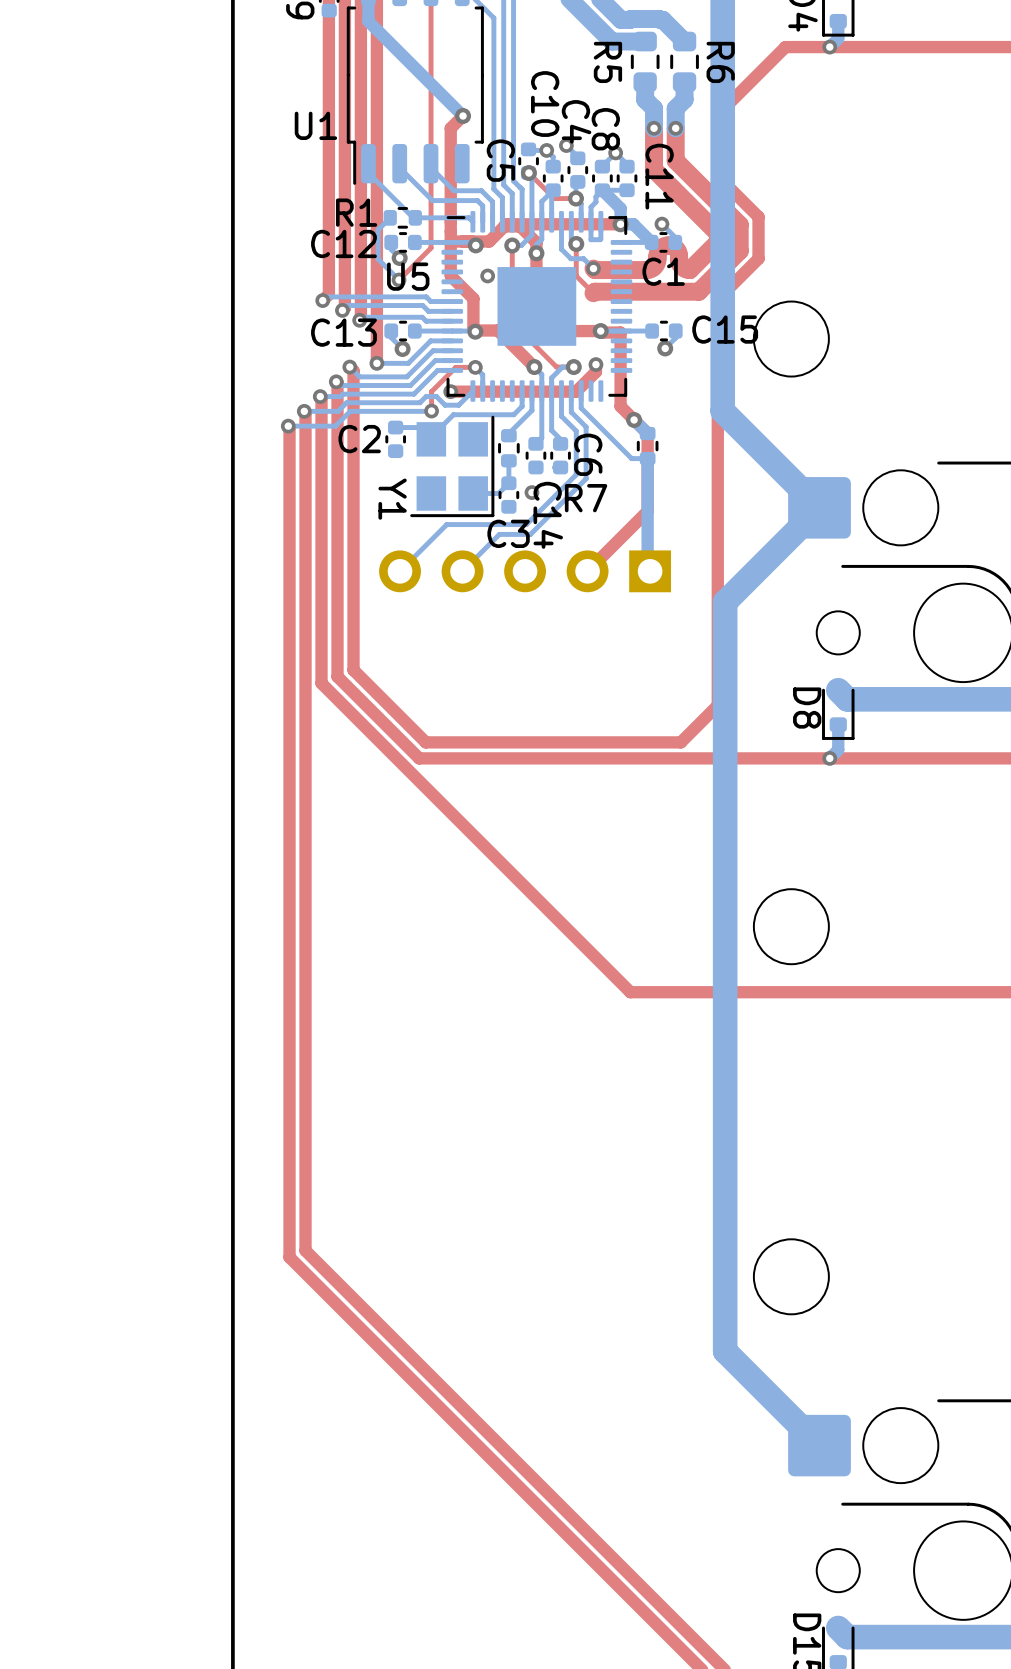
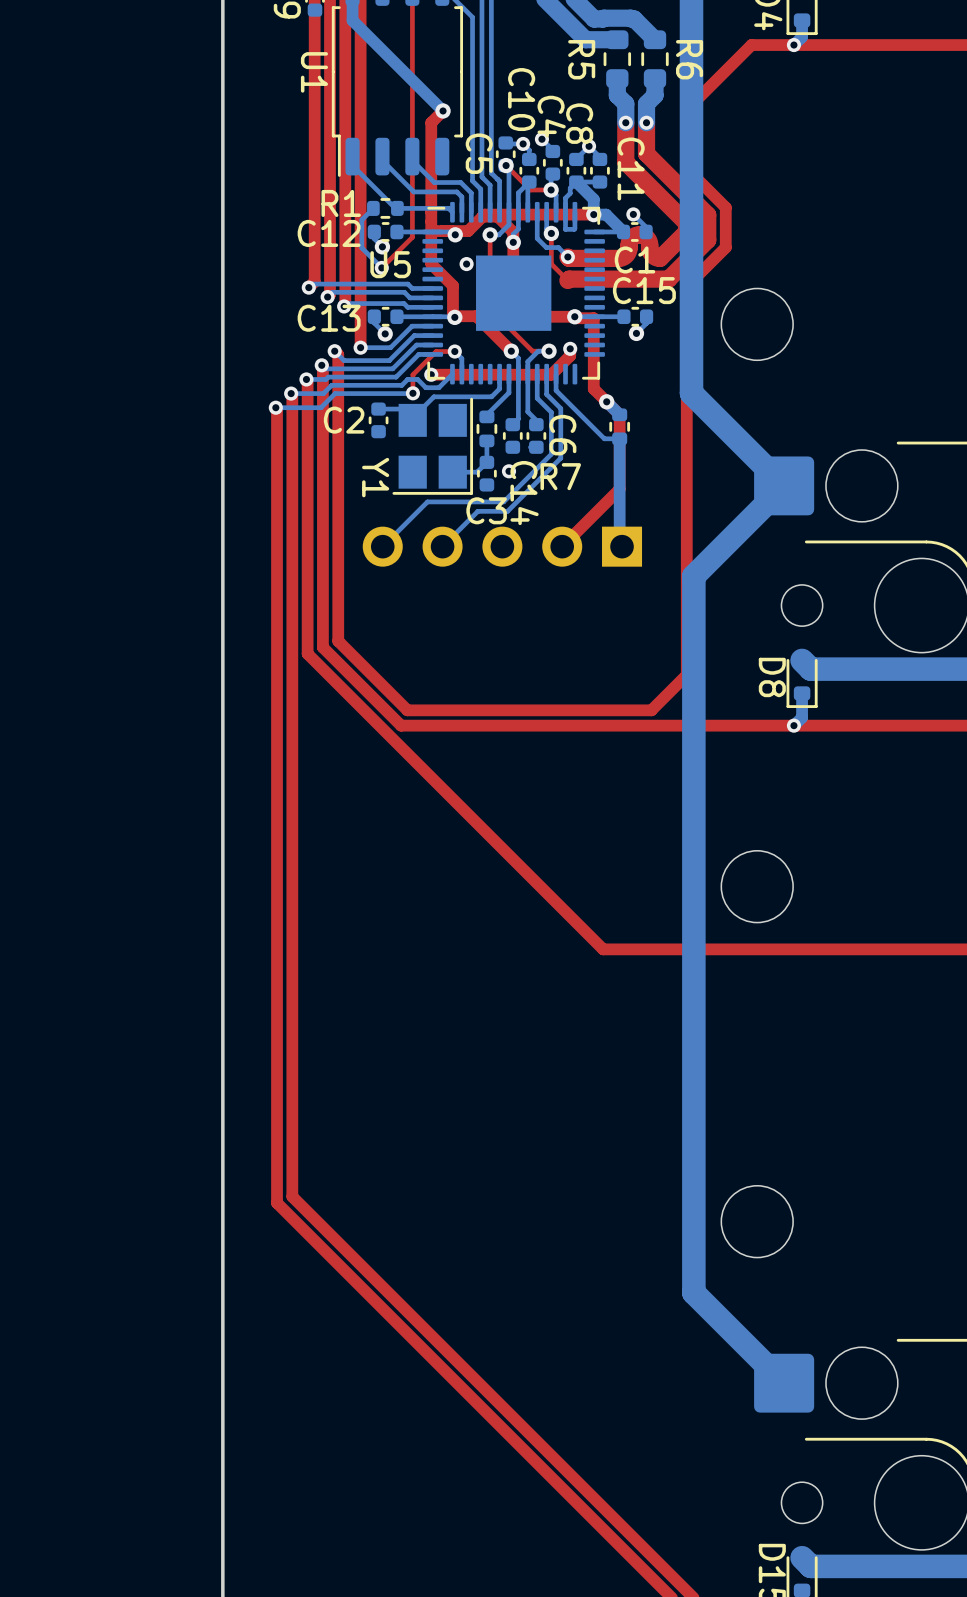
U1 name rotation: 0° (315, 125) -> 90° clockwise (314, 72)
C15 name position: C15 (725, 329) -> C15 (644, 290)

